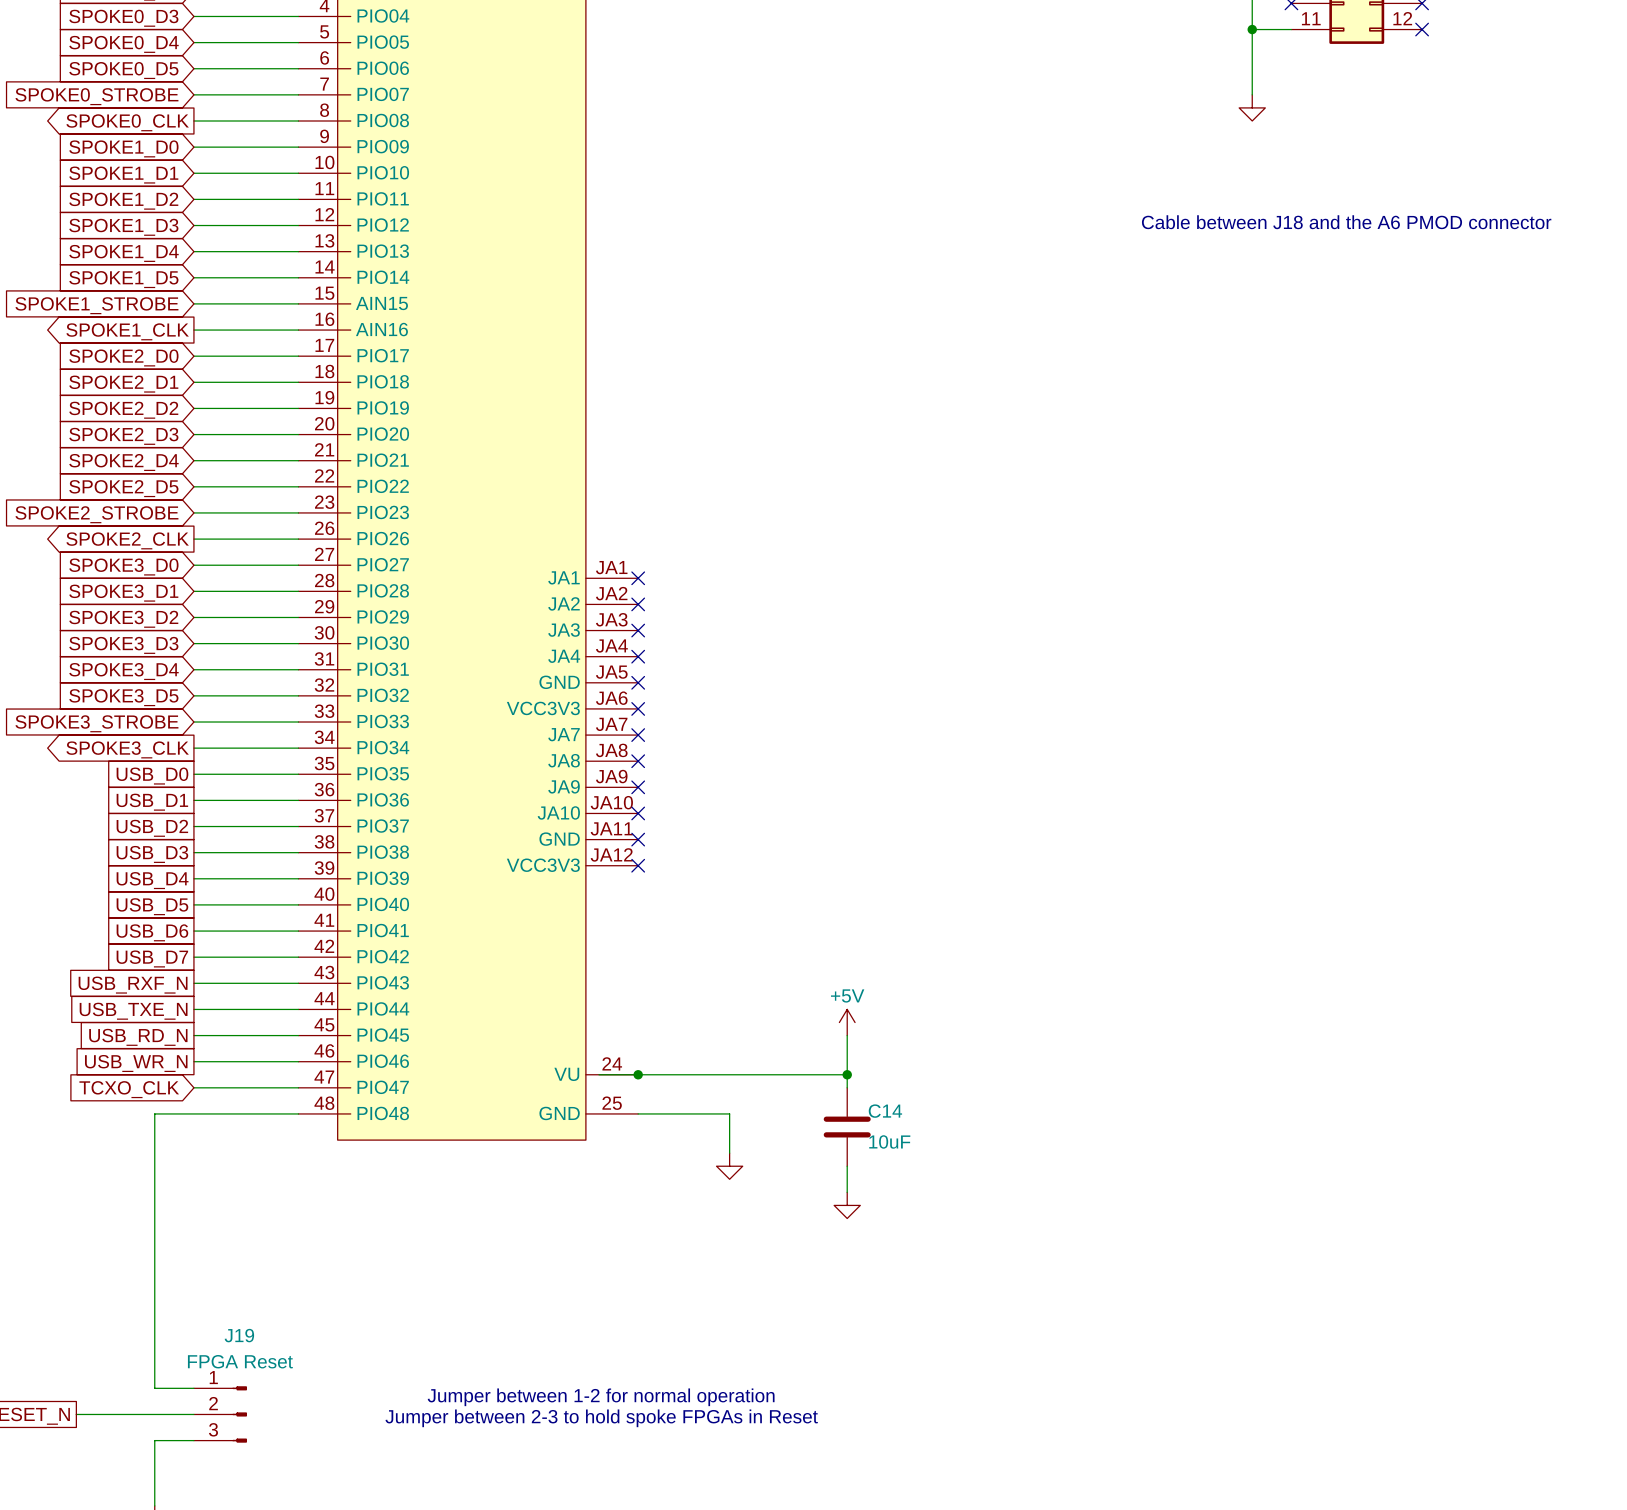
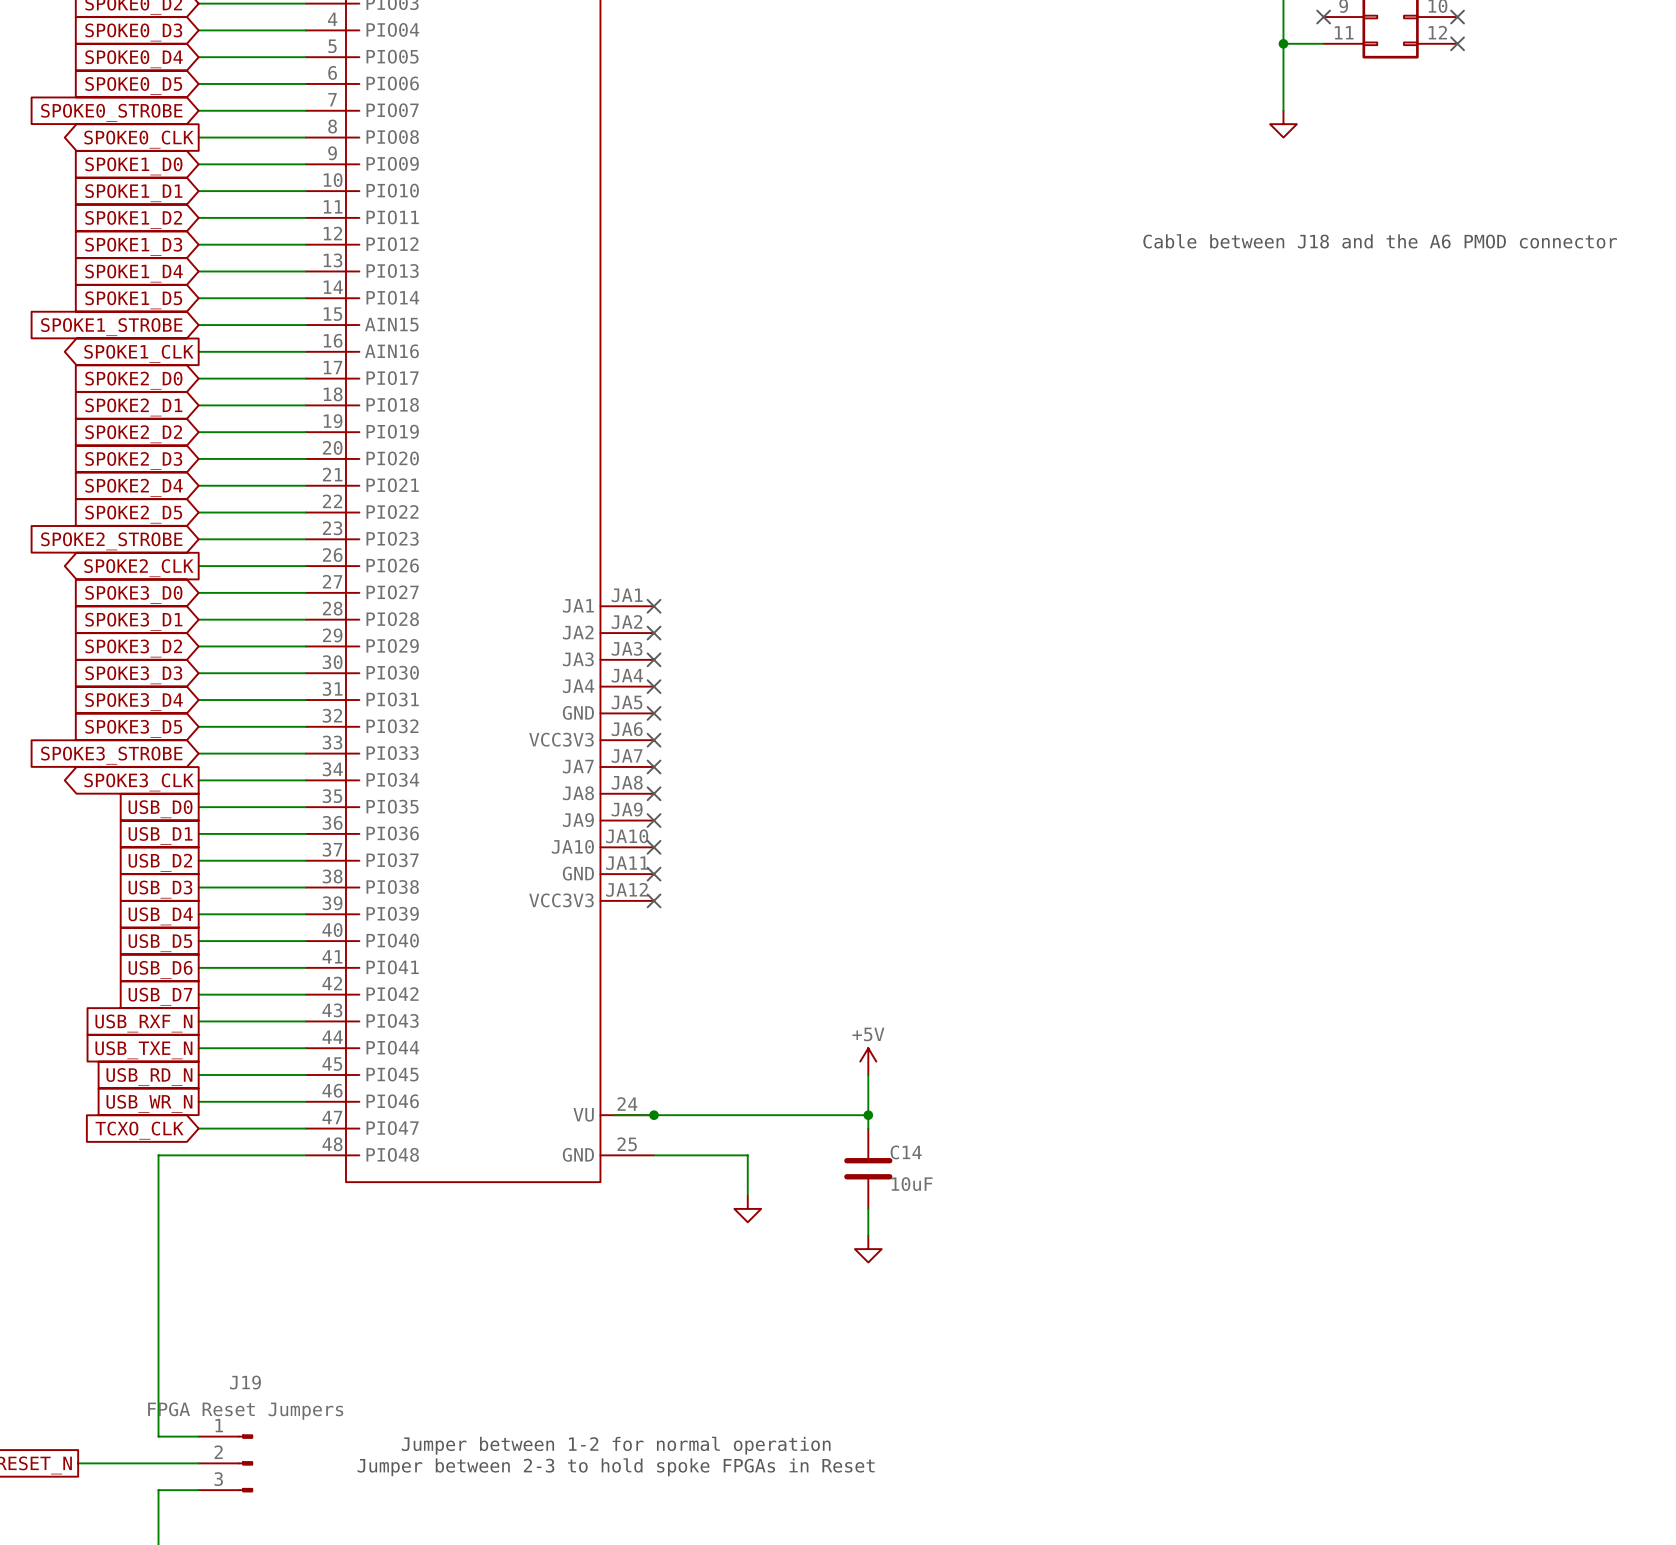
J19 value: FPGA Reset (240, 1361) -> FPGA Reset Jumpers (245, 1411)

